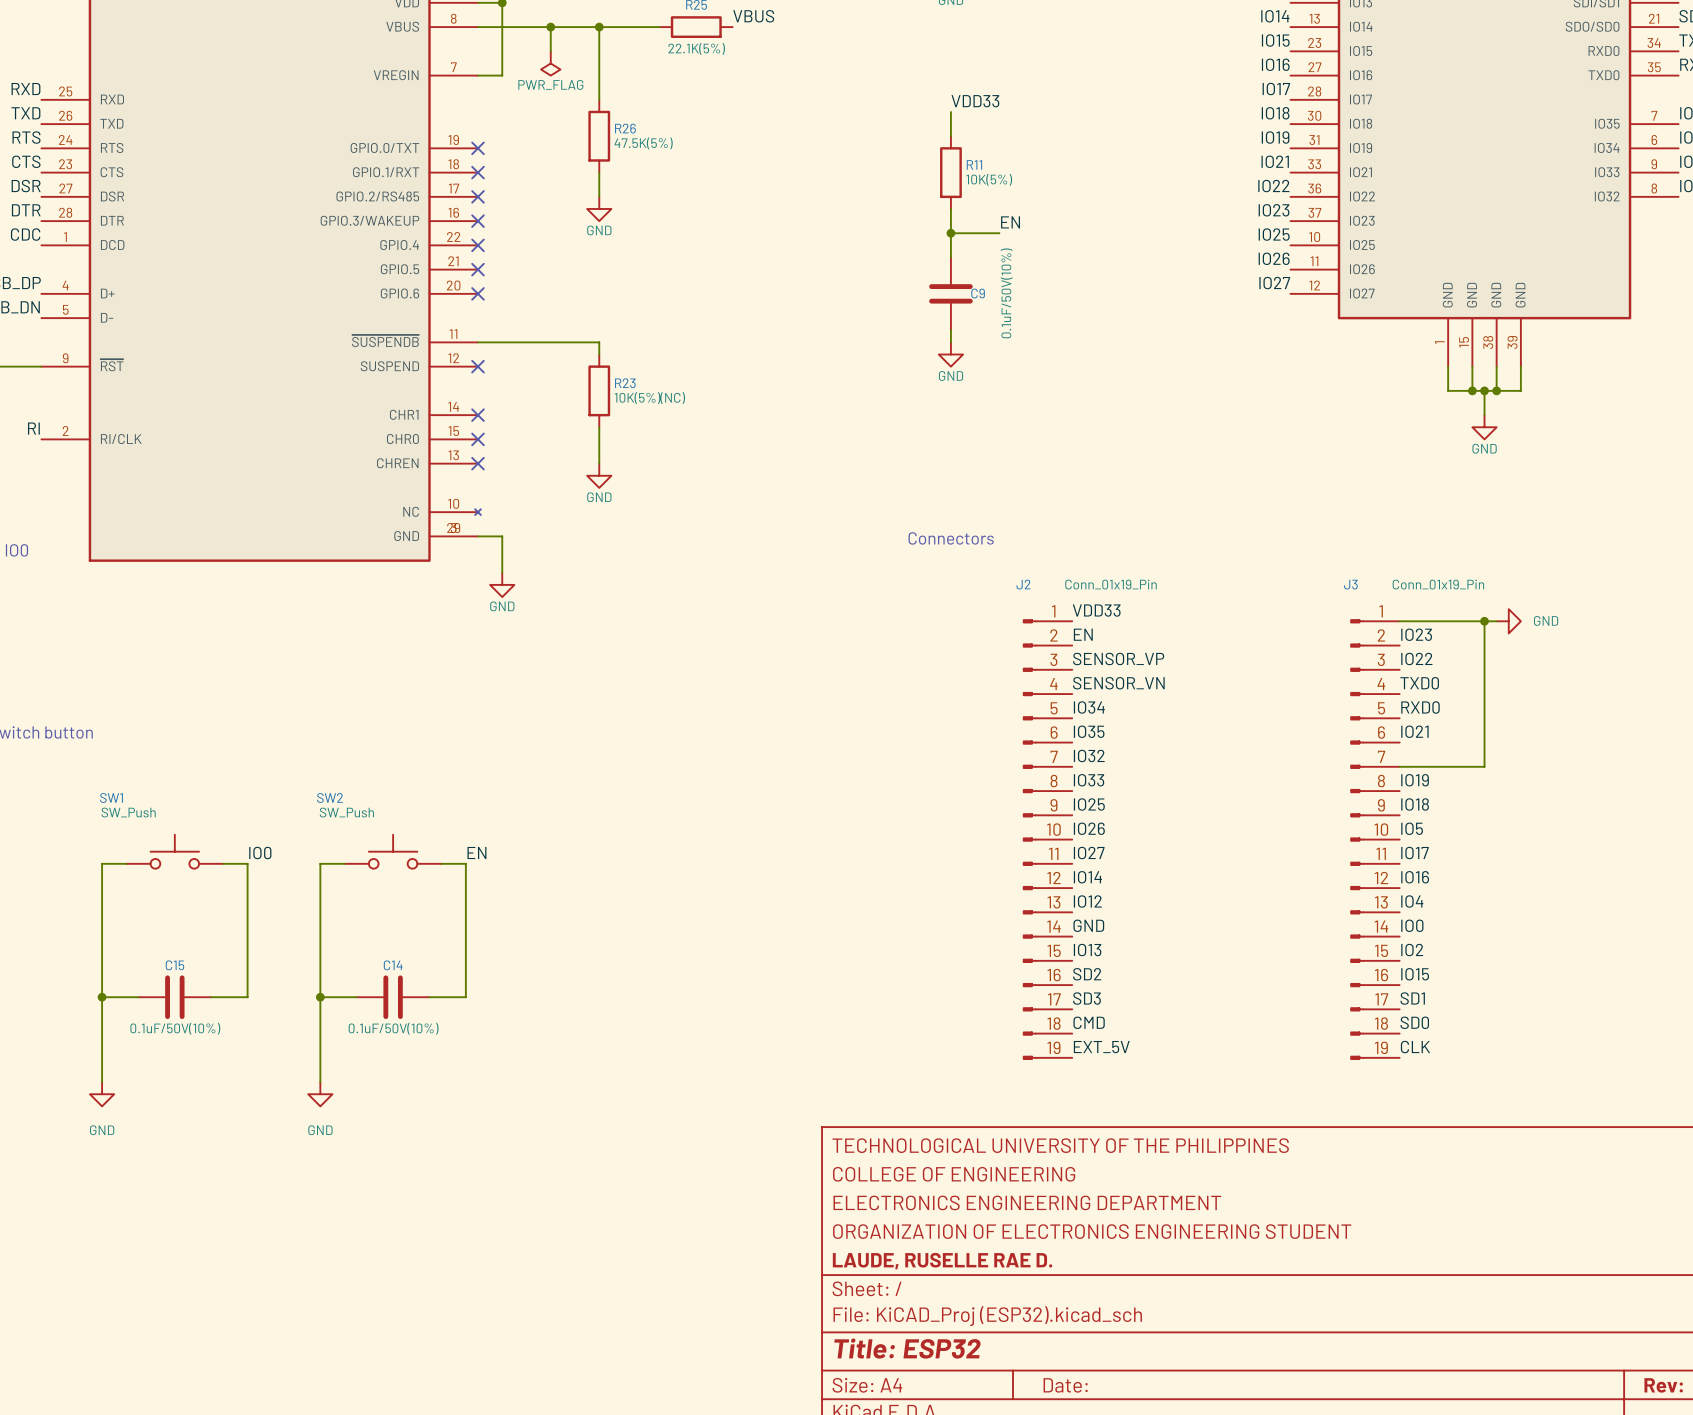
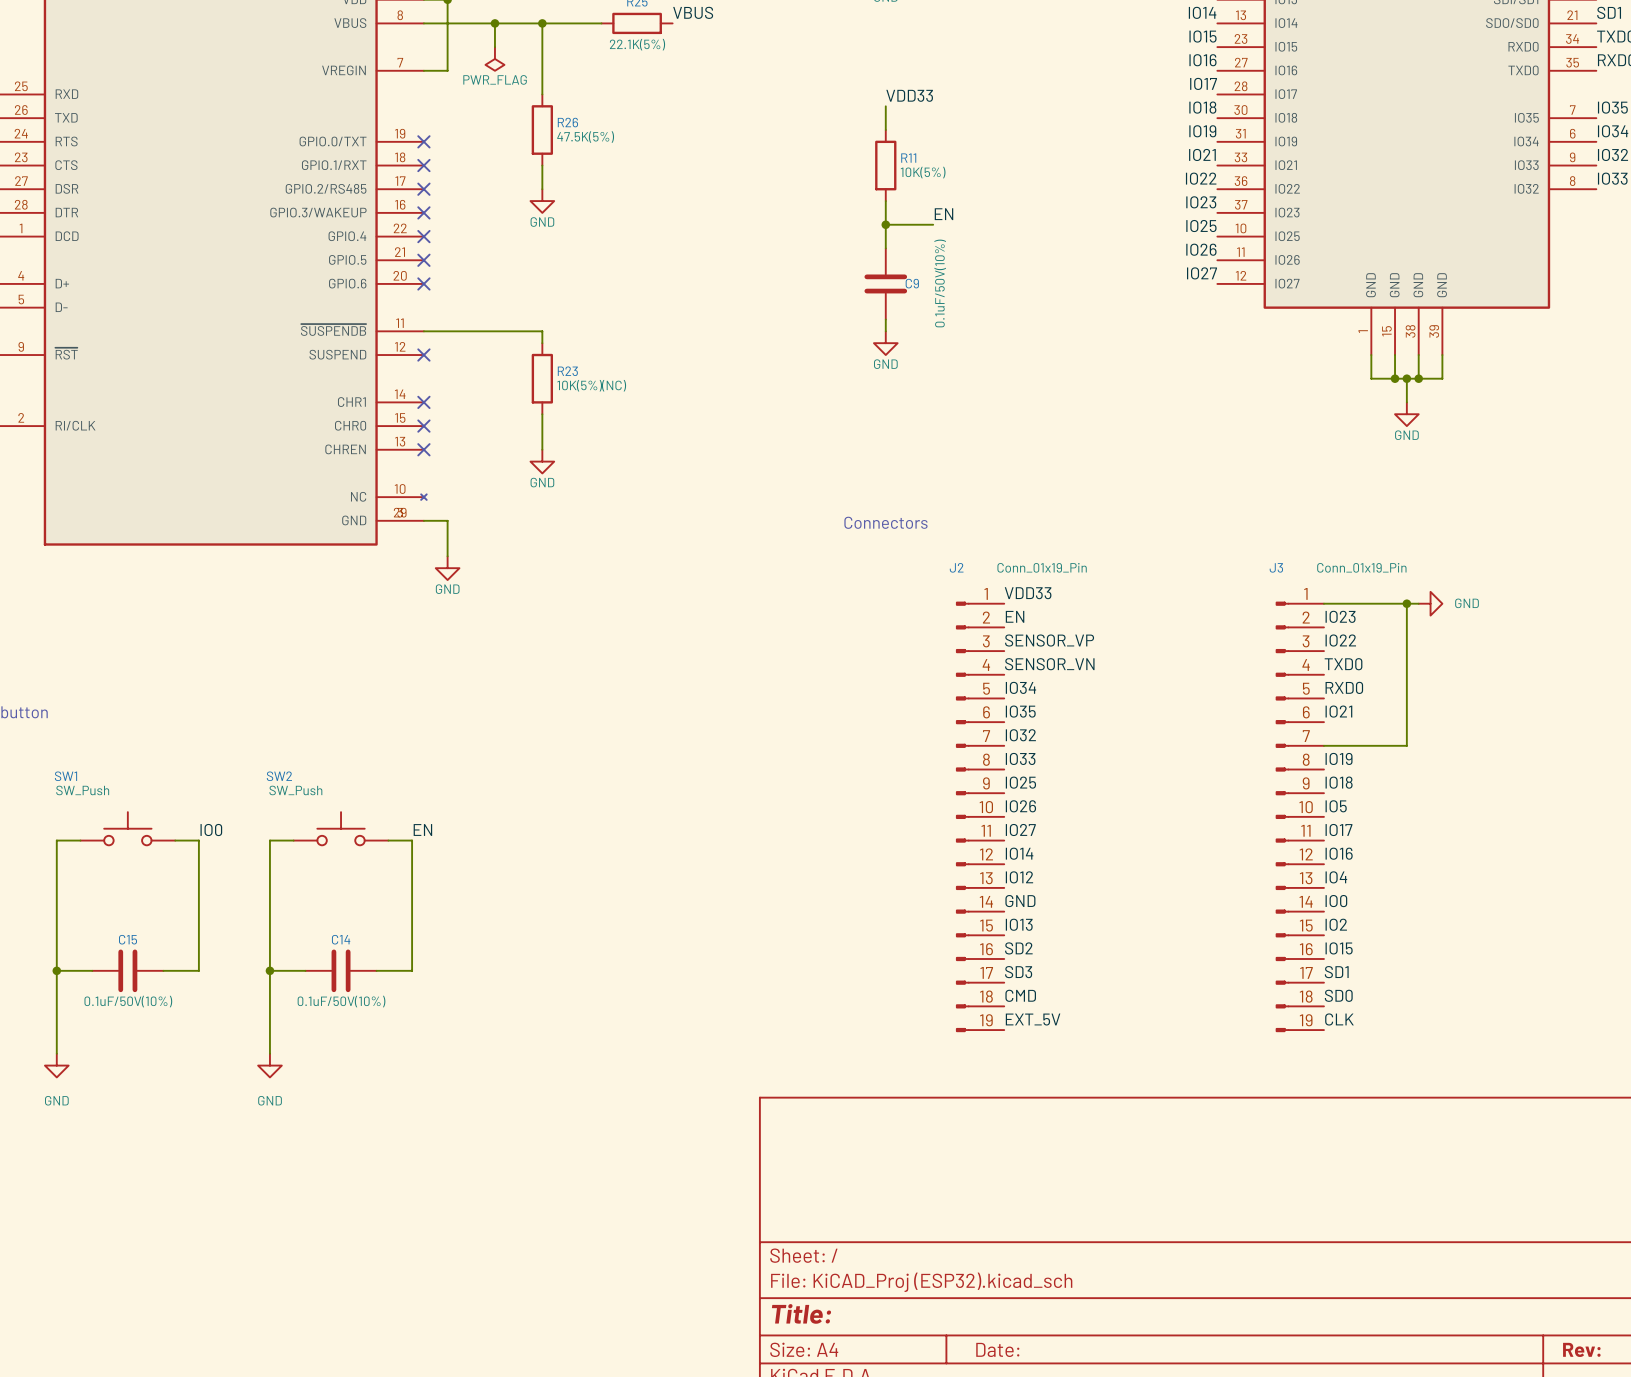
title block: TECHNOLOGICAL UNIVERSITY OF THE PHILIPPINES (1060, 1145) -> none
title block: COLLEGE OF ENGINEERING (954, 1174) -> none
title block: ELECTRONICS ENGINEERING DEPARTMENT (1027, 1202) -> none
title block: ORGANIZATION OF ELECTRONICS ENGINEERING STUDENT (1092, 1231) -> none
title block: LAUDE, RUSELLE RAE D. (942, 1261) -> none
title block: Title: ESP32 (907, 1348) -> Title: (801, 1313)

